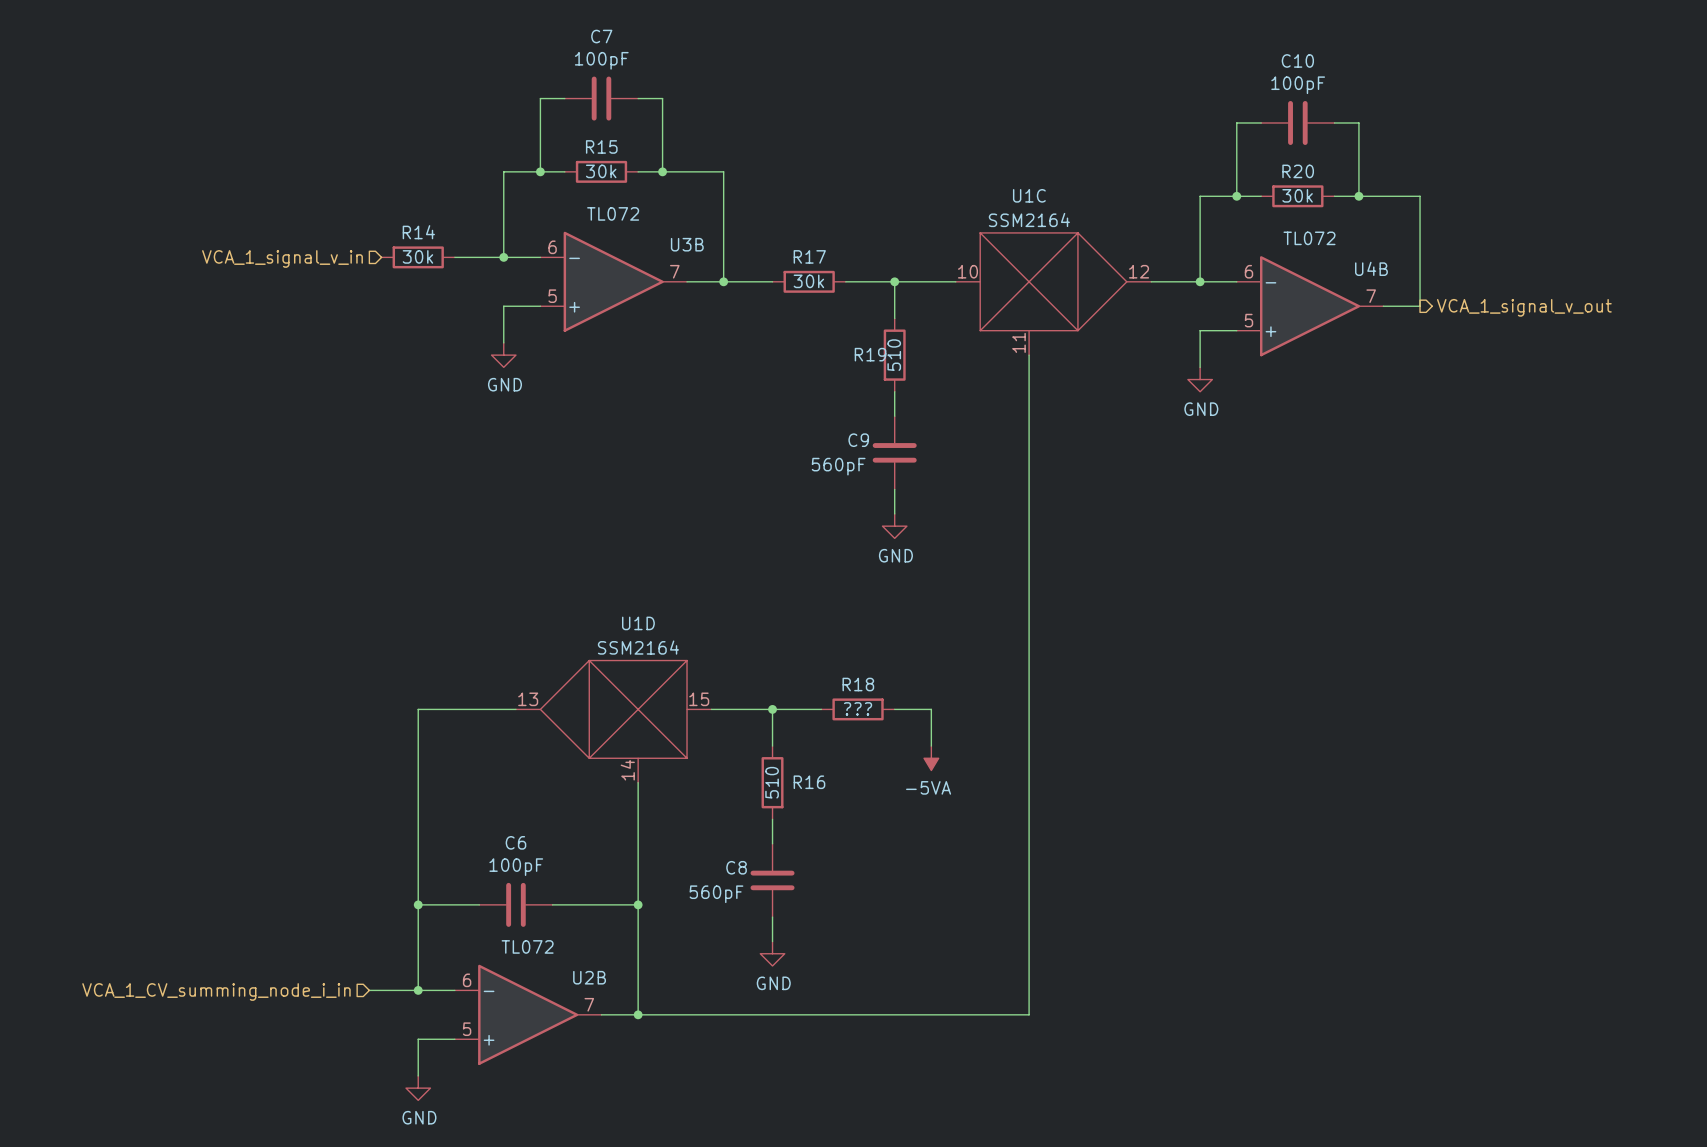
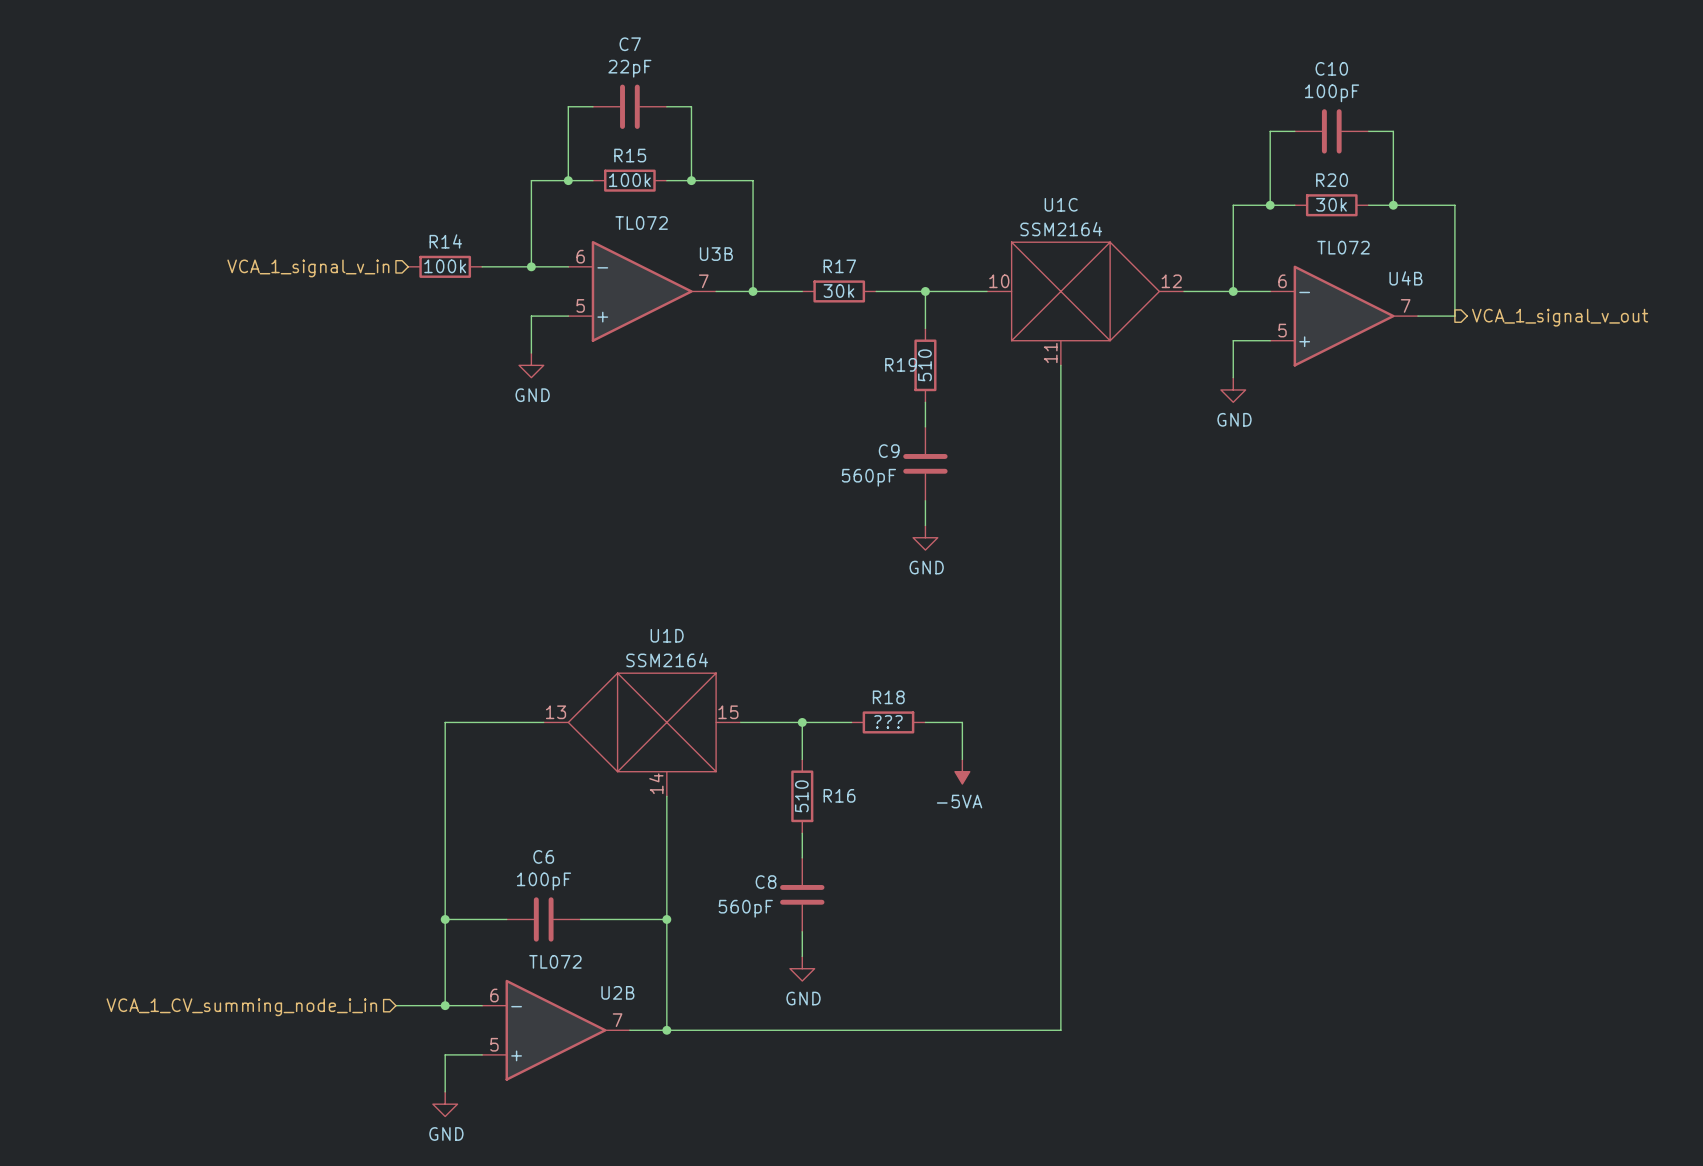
C7 value: 100pF (601, 60) -> 22pF (629, 68)
R15 value: 30k (601, 171) -> 100k (629, 180)
R14 value: 30k (417, 256) -> 100k (445, 266)

